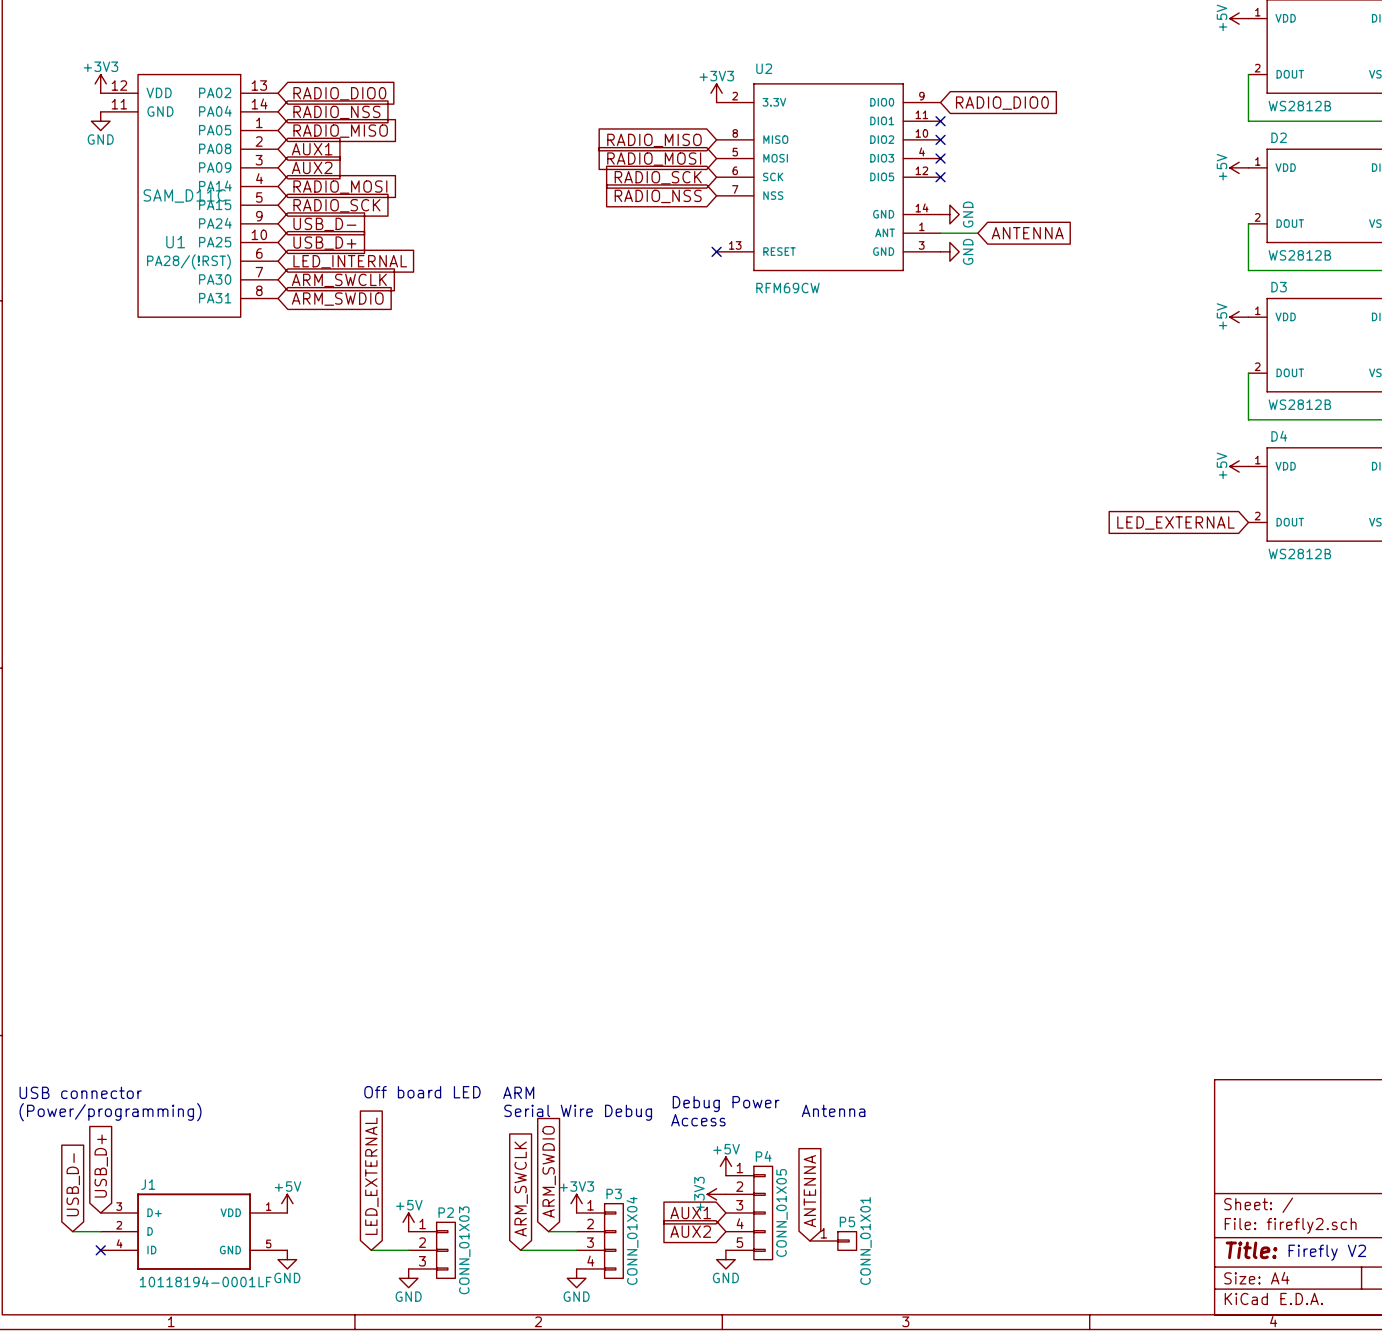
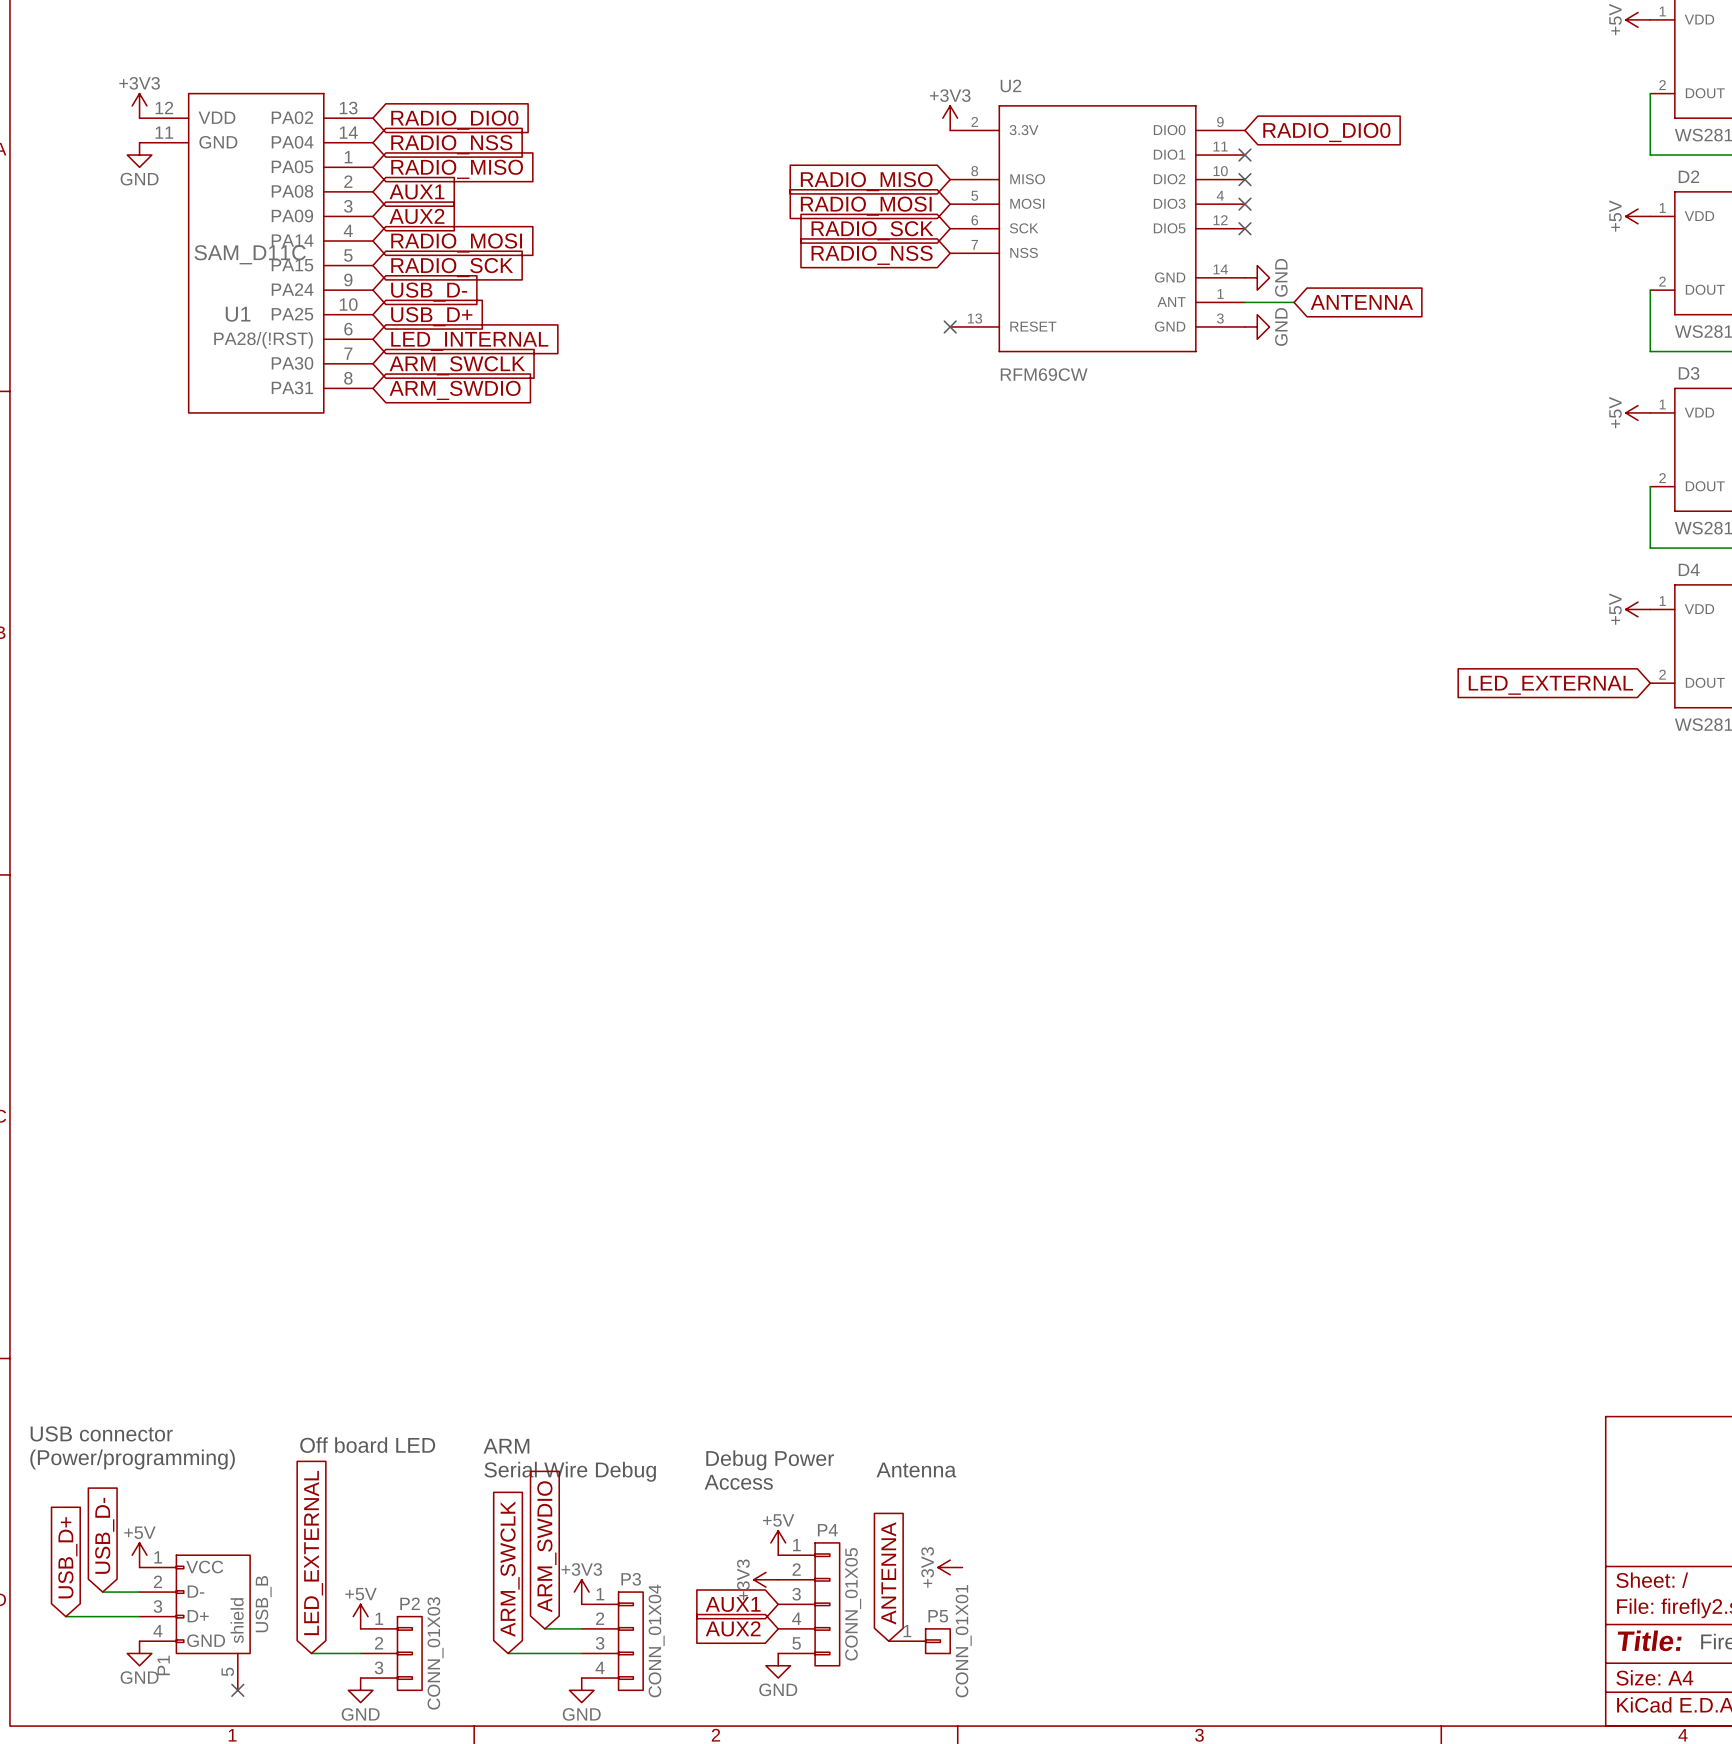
text position: Off board LED (422, 1092) -> Off board LED (367, 1445)
text position: ARM (518, 1092) -> ARM (506, 1446)
text position: Debug Power (726, 1104) -> Debug Power (770, 1460)
text position: Antenna (833, 1110) -> Antenna (916, 1470)
text position: Serial Wire Debug (578, 1112) -> Serial Wire Debug (570, 1471)
text position: Access (698, 1120) -> Access (738, 1482)
global label position: USB_D+ (101, 1166) -> USB_D+ (67, 1557)
power symbol: +5V (725, 1166) -> none
global label position: ARM_SWDIO (549, 1171) -> ARM_SWDIO (546, 1546)
power symbol: none -> +5V (778, 1542)
global label position: LED_EXTERNAL (371, 1176) -> LED_EXTERNAL (313, 1553)
global label position: USB_D- (73, 1184) -> USB_D- (104, 1535)
power symbol: none -> +5V (139, 1555)
global label position: ARM_SWCLK (521, 1189) -> ARM_SWCLK (510, 1569)
global label position: ANTENNA (809, 1191) -> ANTENNA (888, 1573)
power symbol position: +5V (287, 1203) -> +5V (360, 1616)
power symbol rotation: 0° (576, 1203) -> 90° counterclockwise (765, 1579)
wire: none -> (102, 1592) (139, 1592)
power symbol: none -> +3V3 (581, 1592)
global label position: AUX1 (690, 1213) -> AUX1 (733, 1604)
P4 position: (749, 1213) -> (808, 1604)
power symbol: +5V (408, 1222) -> none
wire: none -> (65, 1616) (102, 1616)
J1: 10118194-0001LF (194, 1231) -> none
wire: (548, 1231) (576, 1231) -> (544, 1628) (581, 1628)
global label position: AUX2 (690, 1231) -> AUX2 (733, 1628)
P1: none -> USB_B (194, 1622)
P3 position: (599, 1240) -> (612, 1641)
P5 position: (833, 1240) -> (919, 1641)
no-connect mark: (100, 1250) -> none
wire: (371, 1250) (408, 1250) -> (311, 1653) (360, 1653)
P2 position: (431, 1250) -> (391, 1653)
wire: (520, 1250) (576, 1250) -> (508, 1653) (581, 1653)
power symbol: none -> GND (139, 1653)
power symbol position: GND (287, 1259) -> GND (360, 1690)
power symbol: GND (725, 1259) -> none
power symbol position: GND (408, 1278) -> GND (581, 1690)
power symbol position: GND (576, 1278) -> GND (778, 1665)
no-connect mark: none -> (237, 1690)

